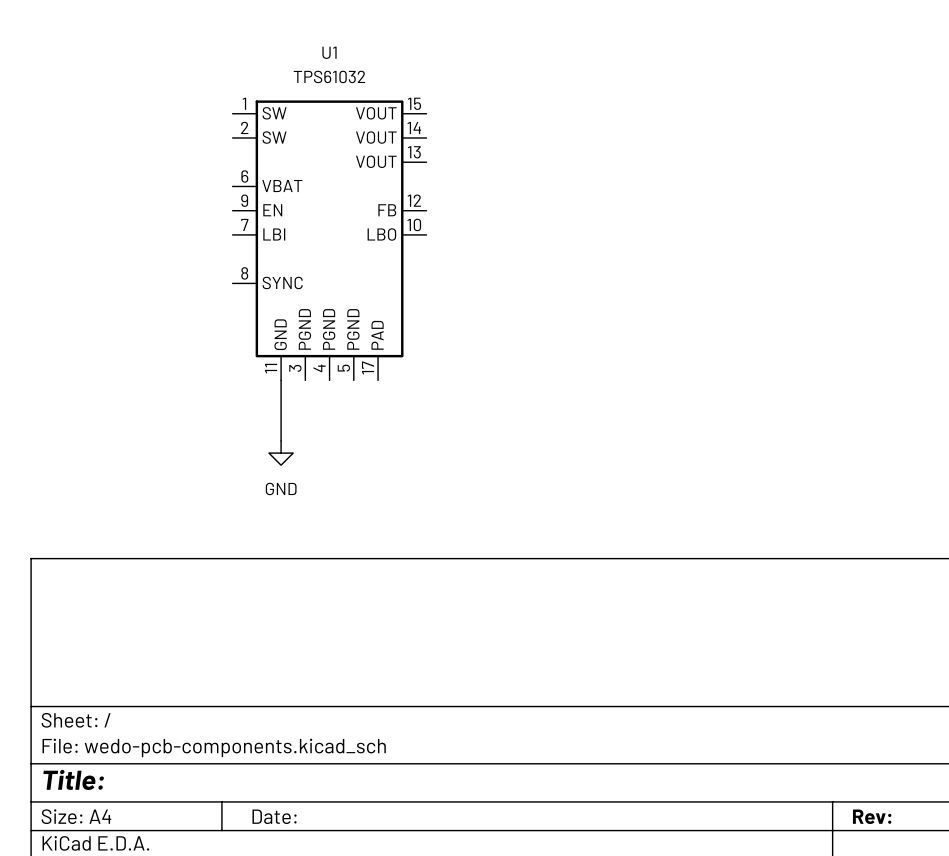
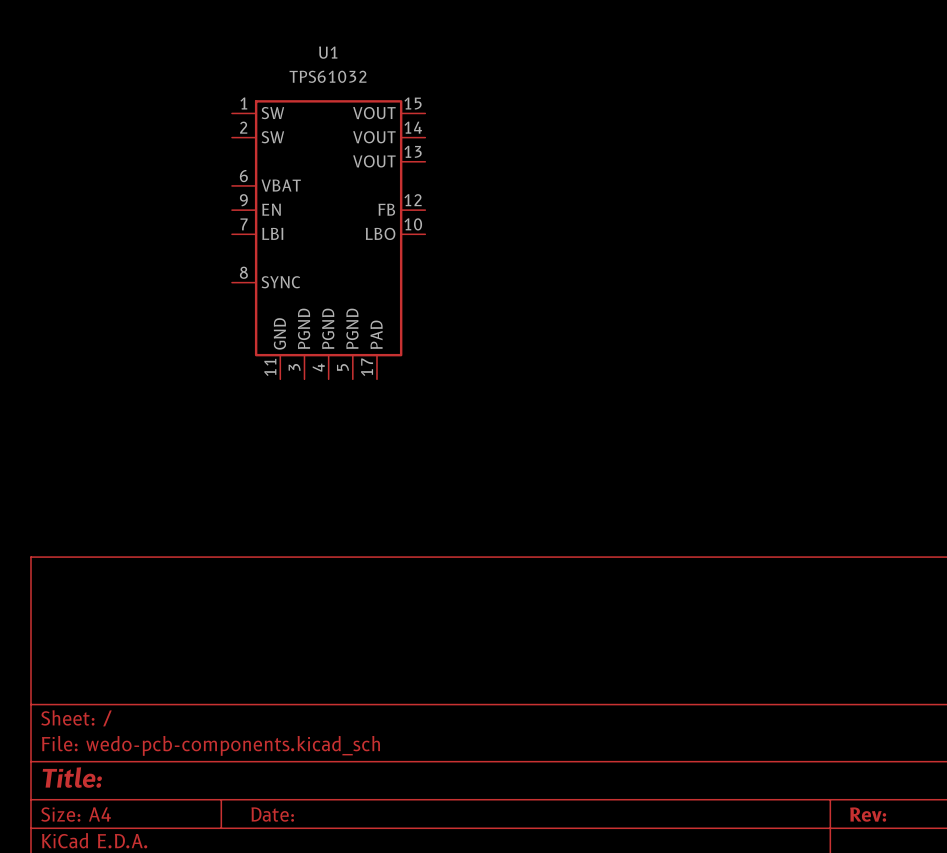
wire: (281, 380) (281, 440) -> none
power symbol: GND (281, 453) -> none

